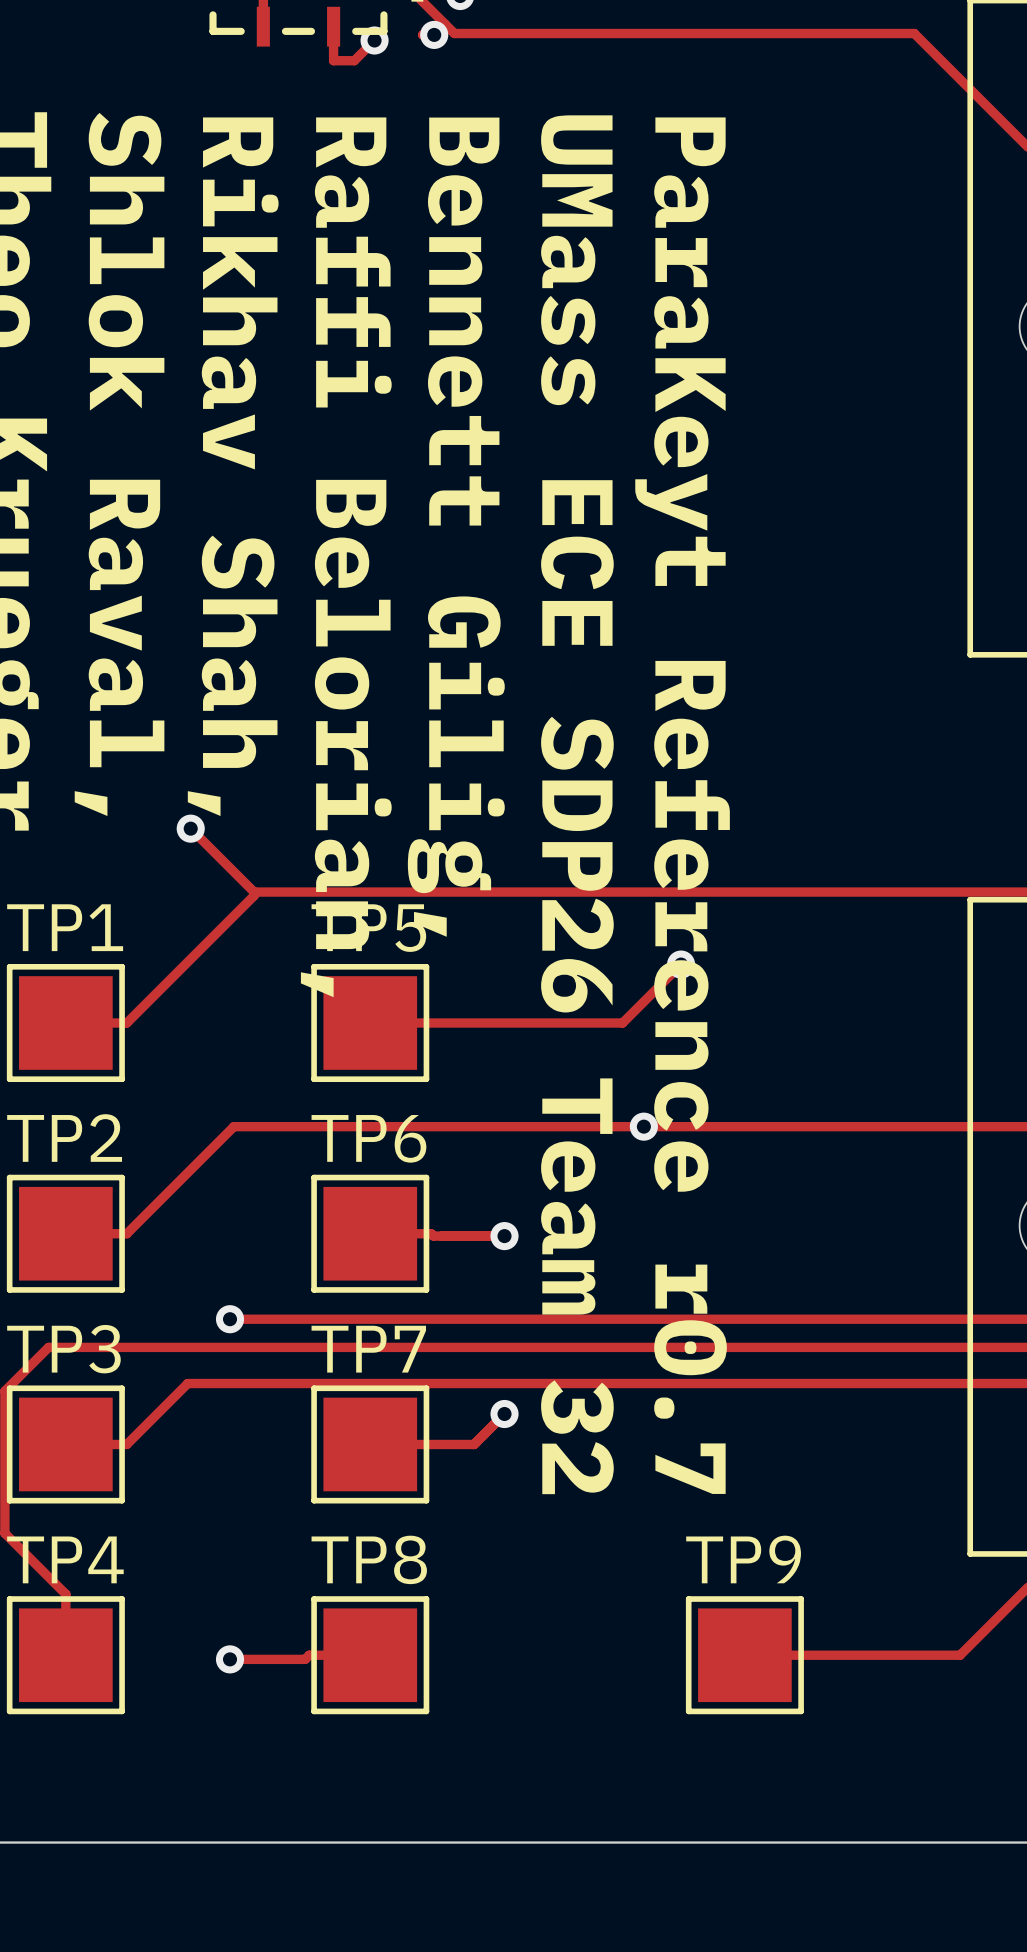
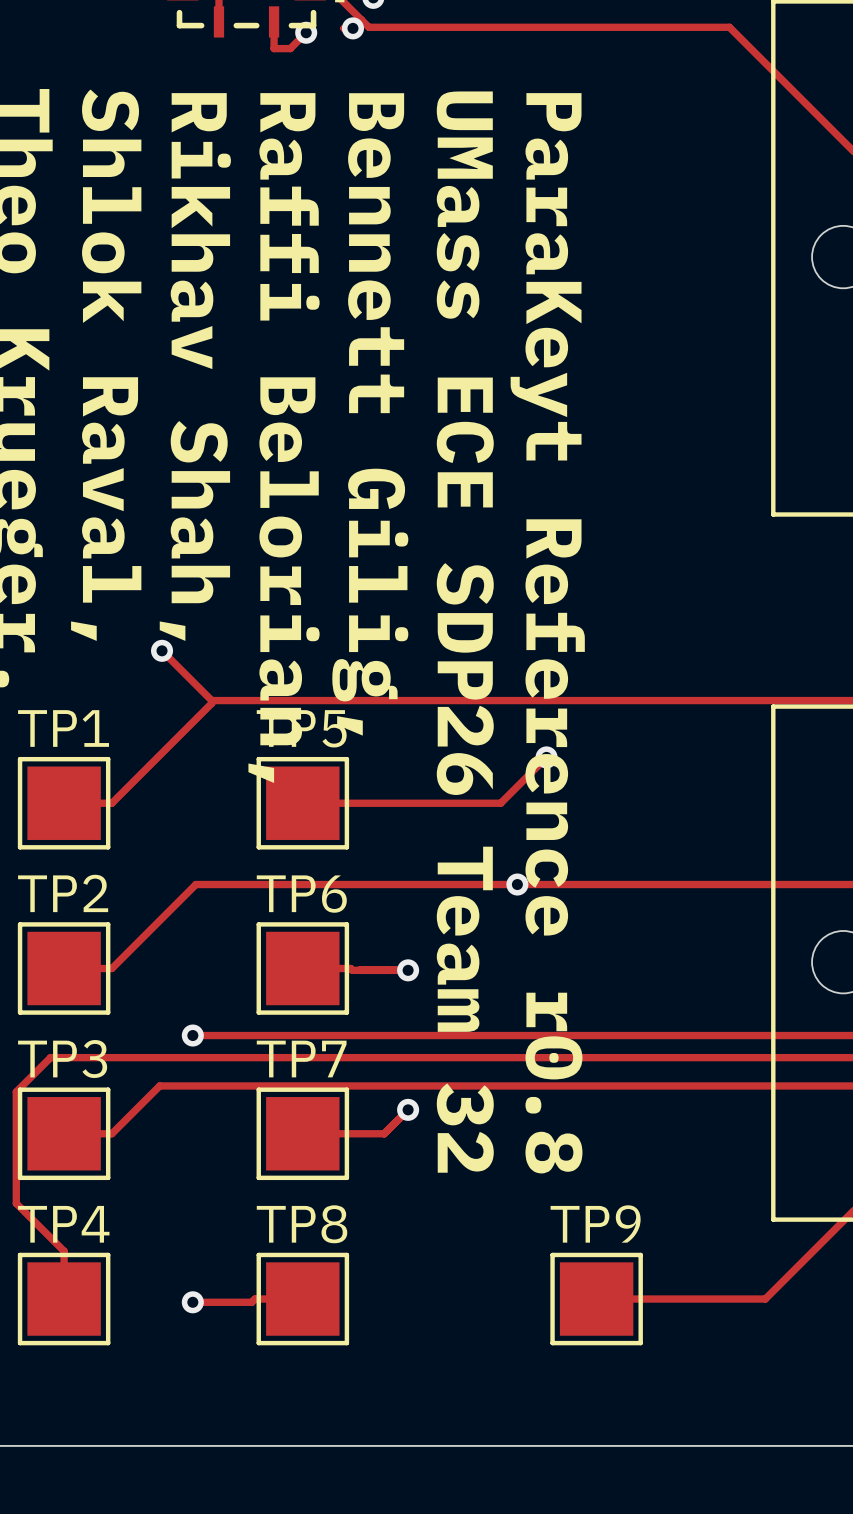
text: ParaKeyt Reference r0.7 (682, 805) -> ParaKeyt Reference r0.8 (547, 633)

